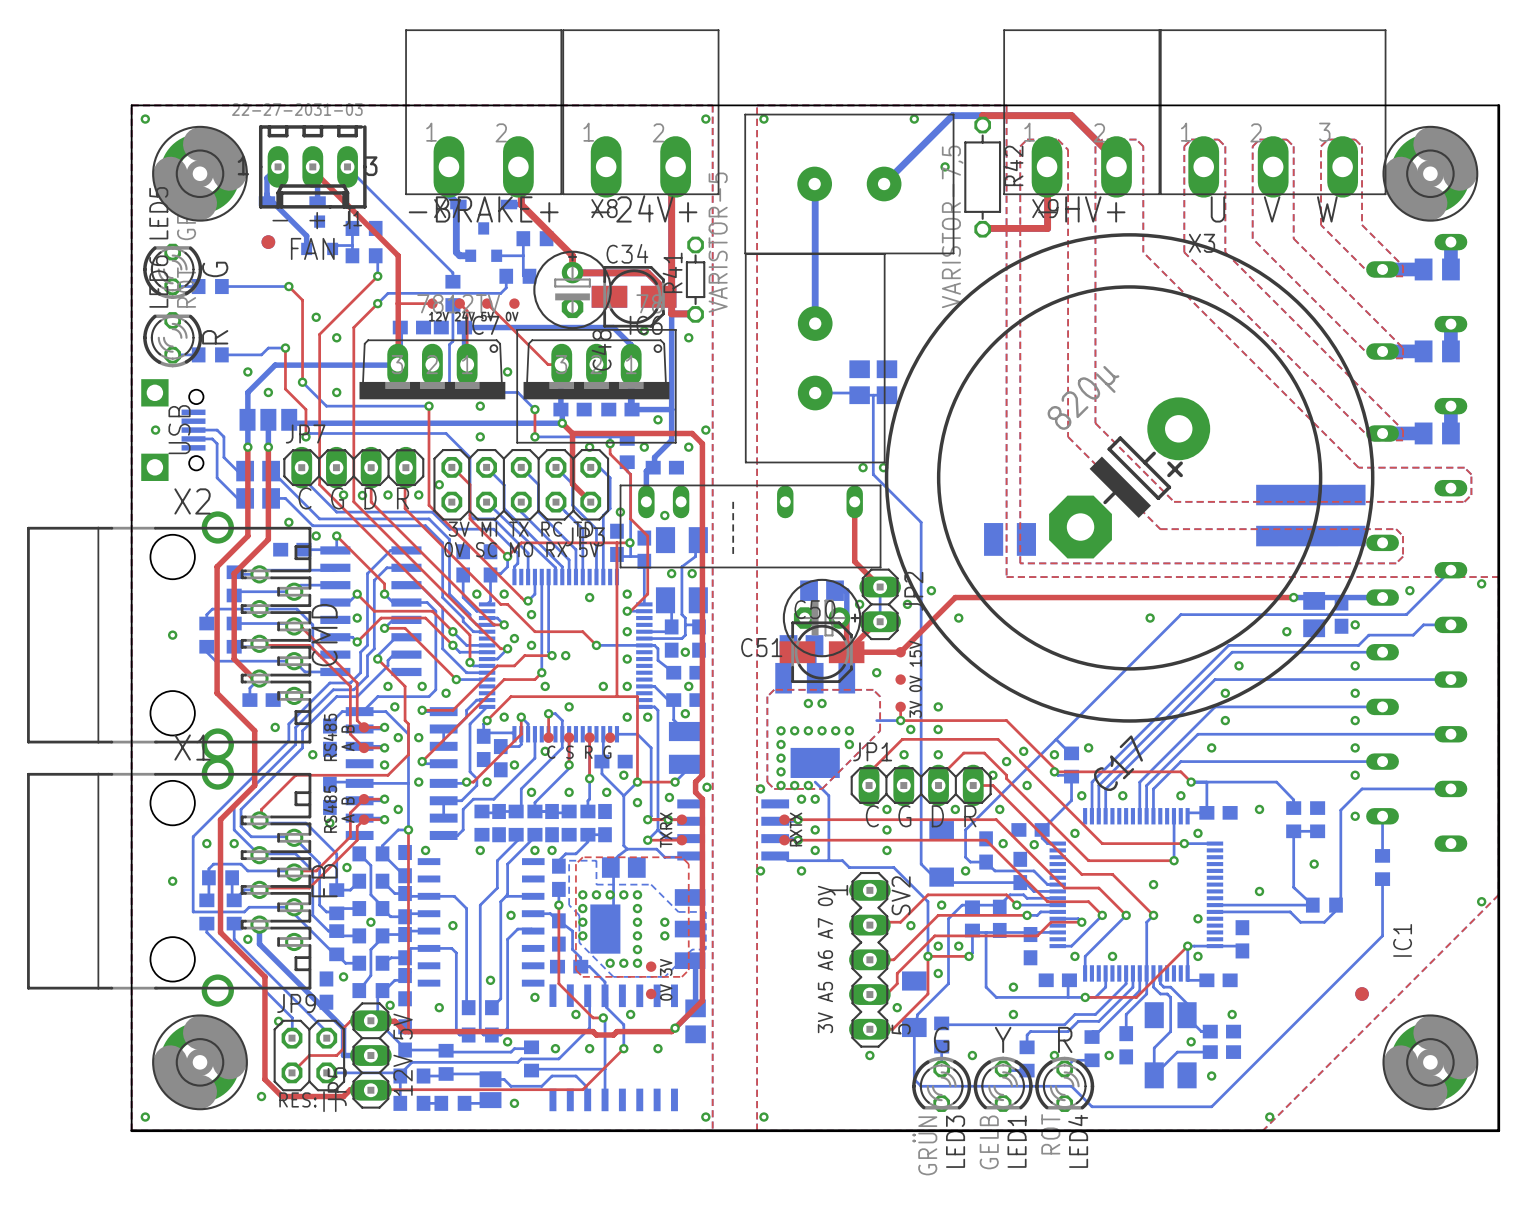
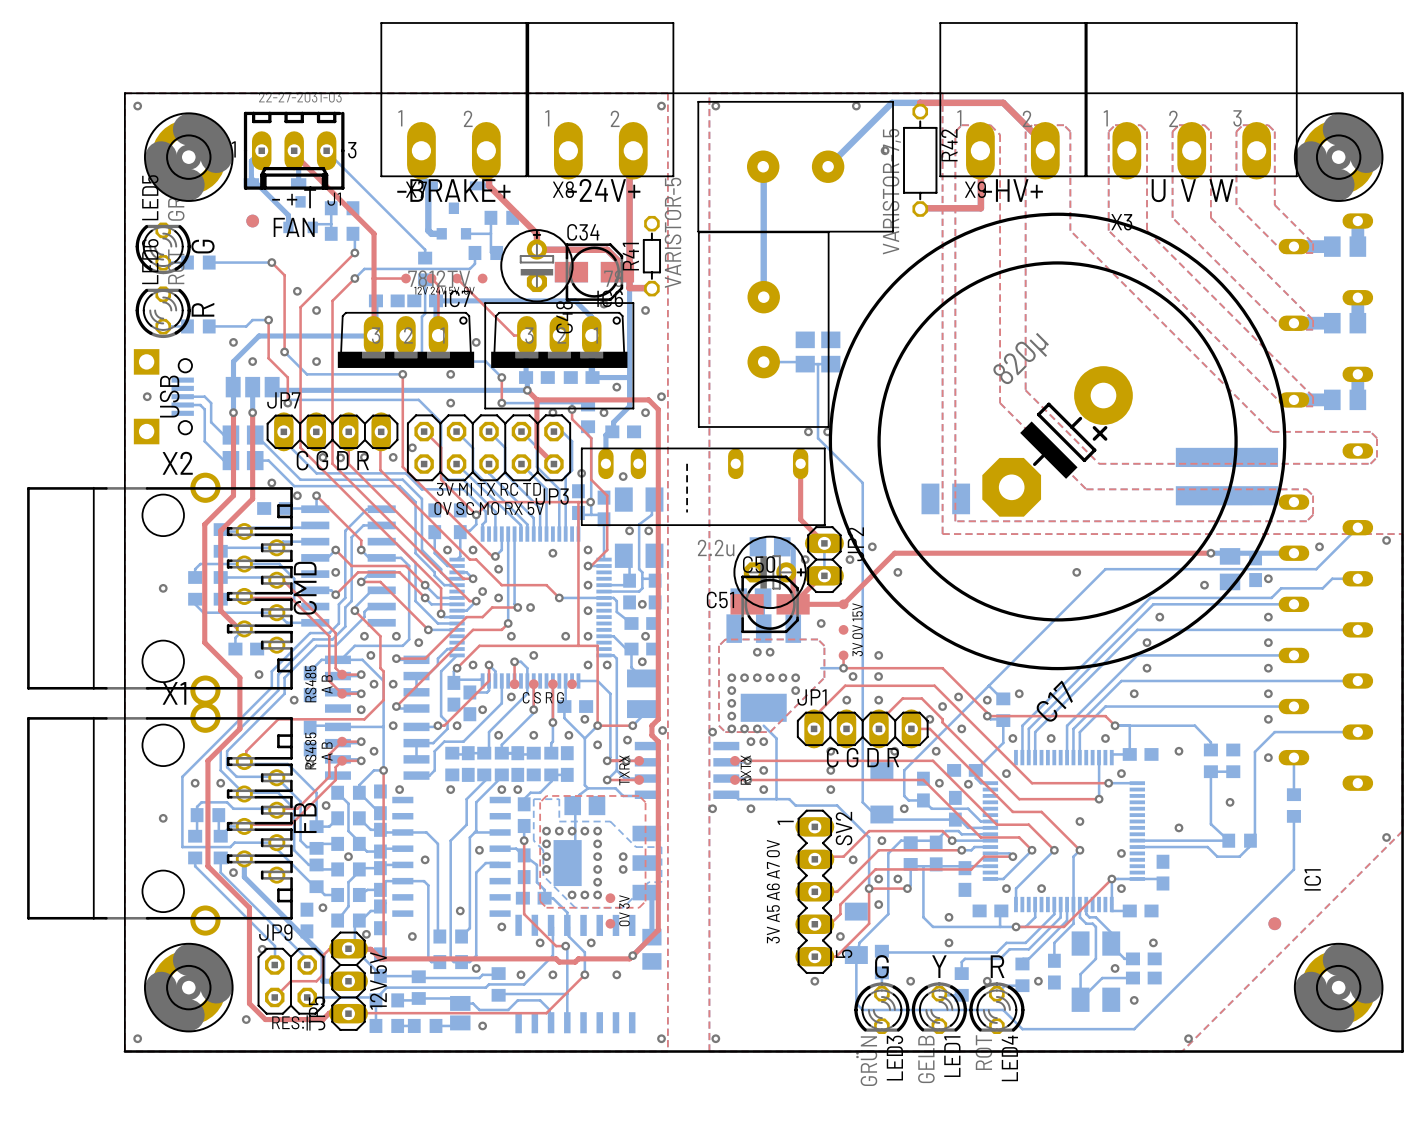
C51 value: none -> 2.2u (716, 548)

